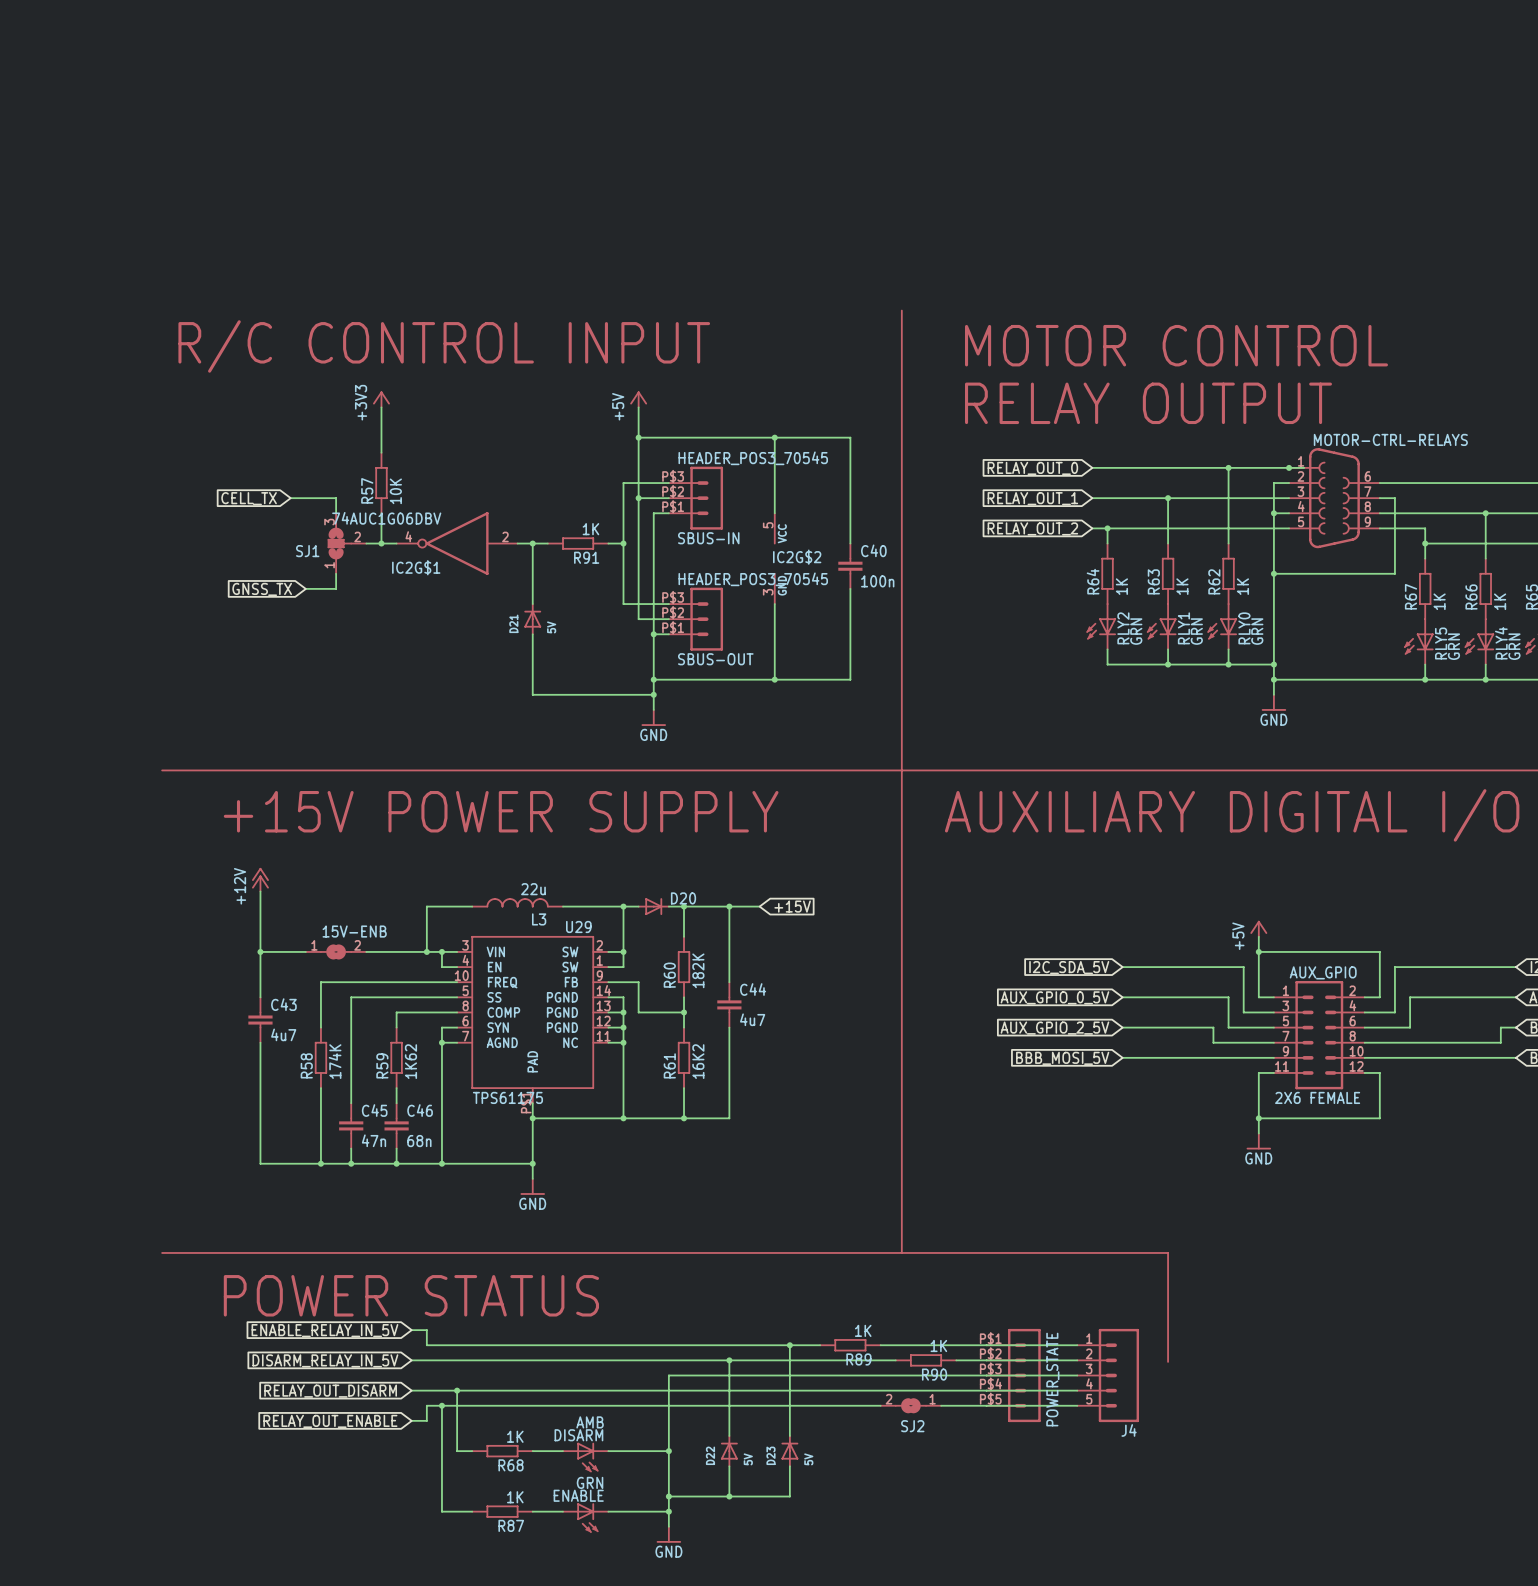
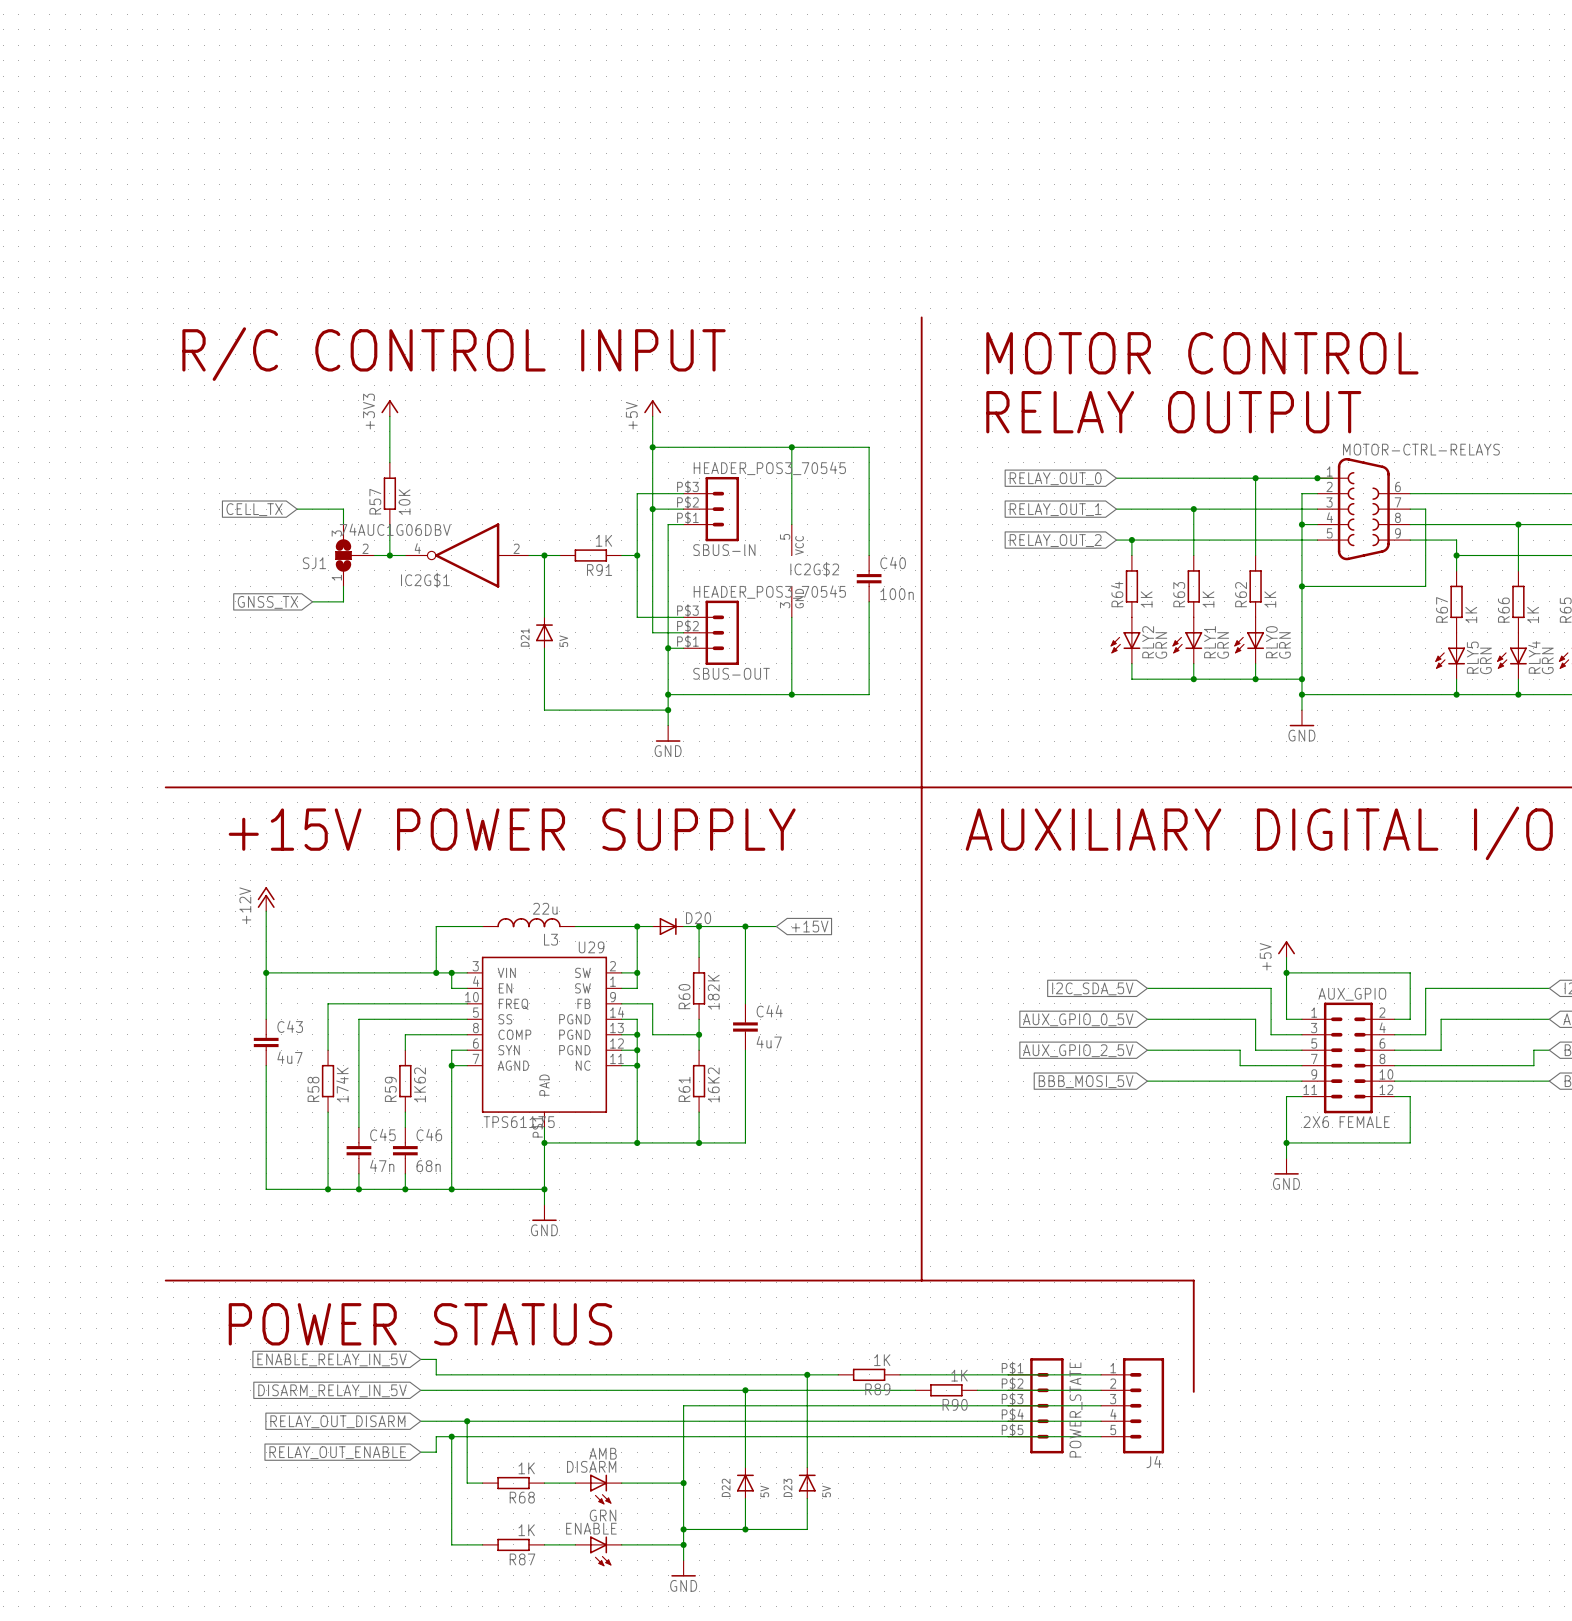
15V-ENB: (336, 951) -> none
SJ2: (910, 1405) -> none

